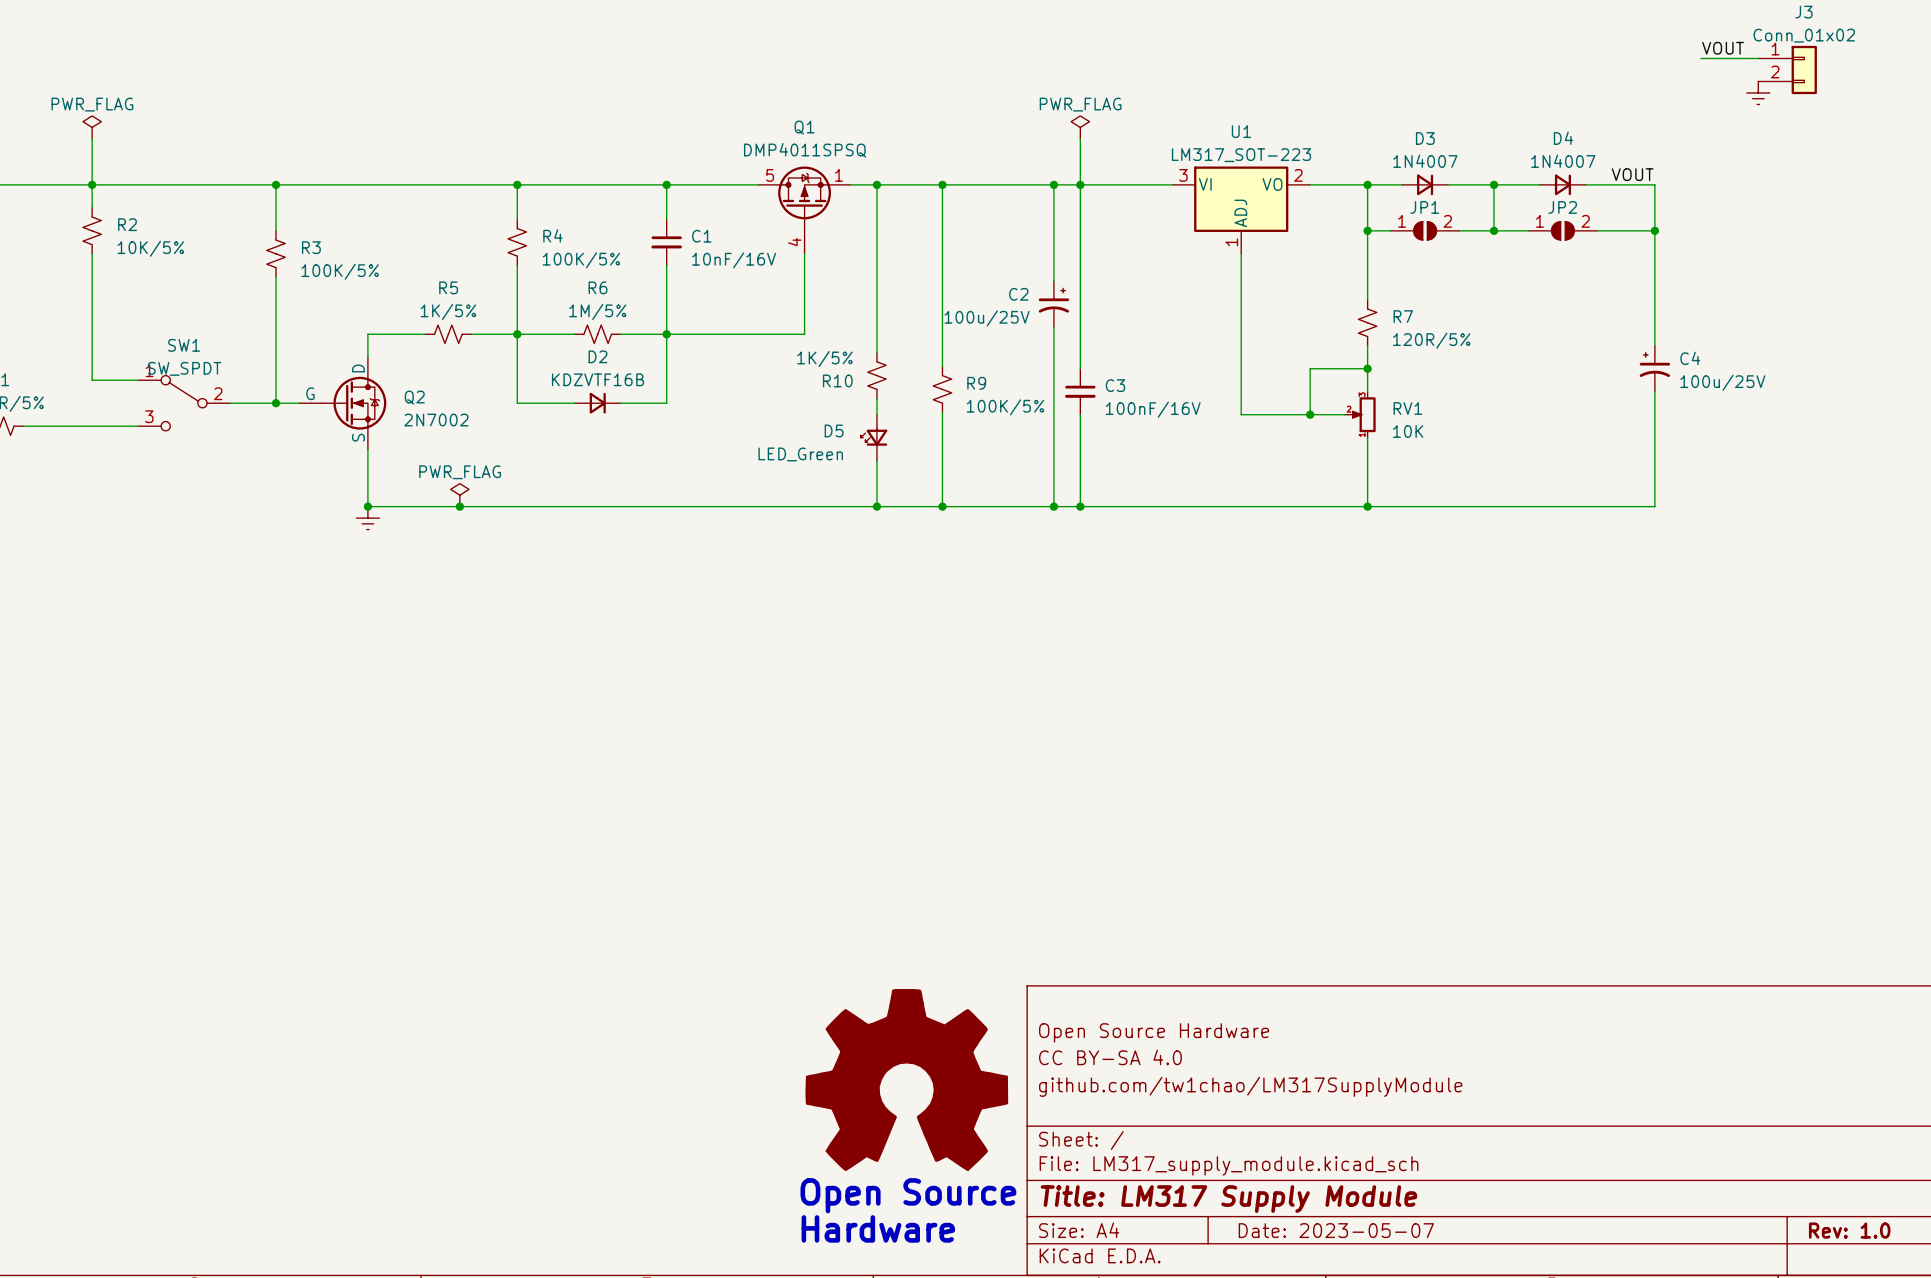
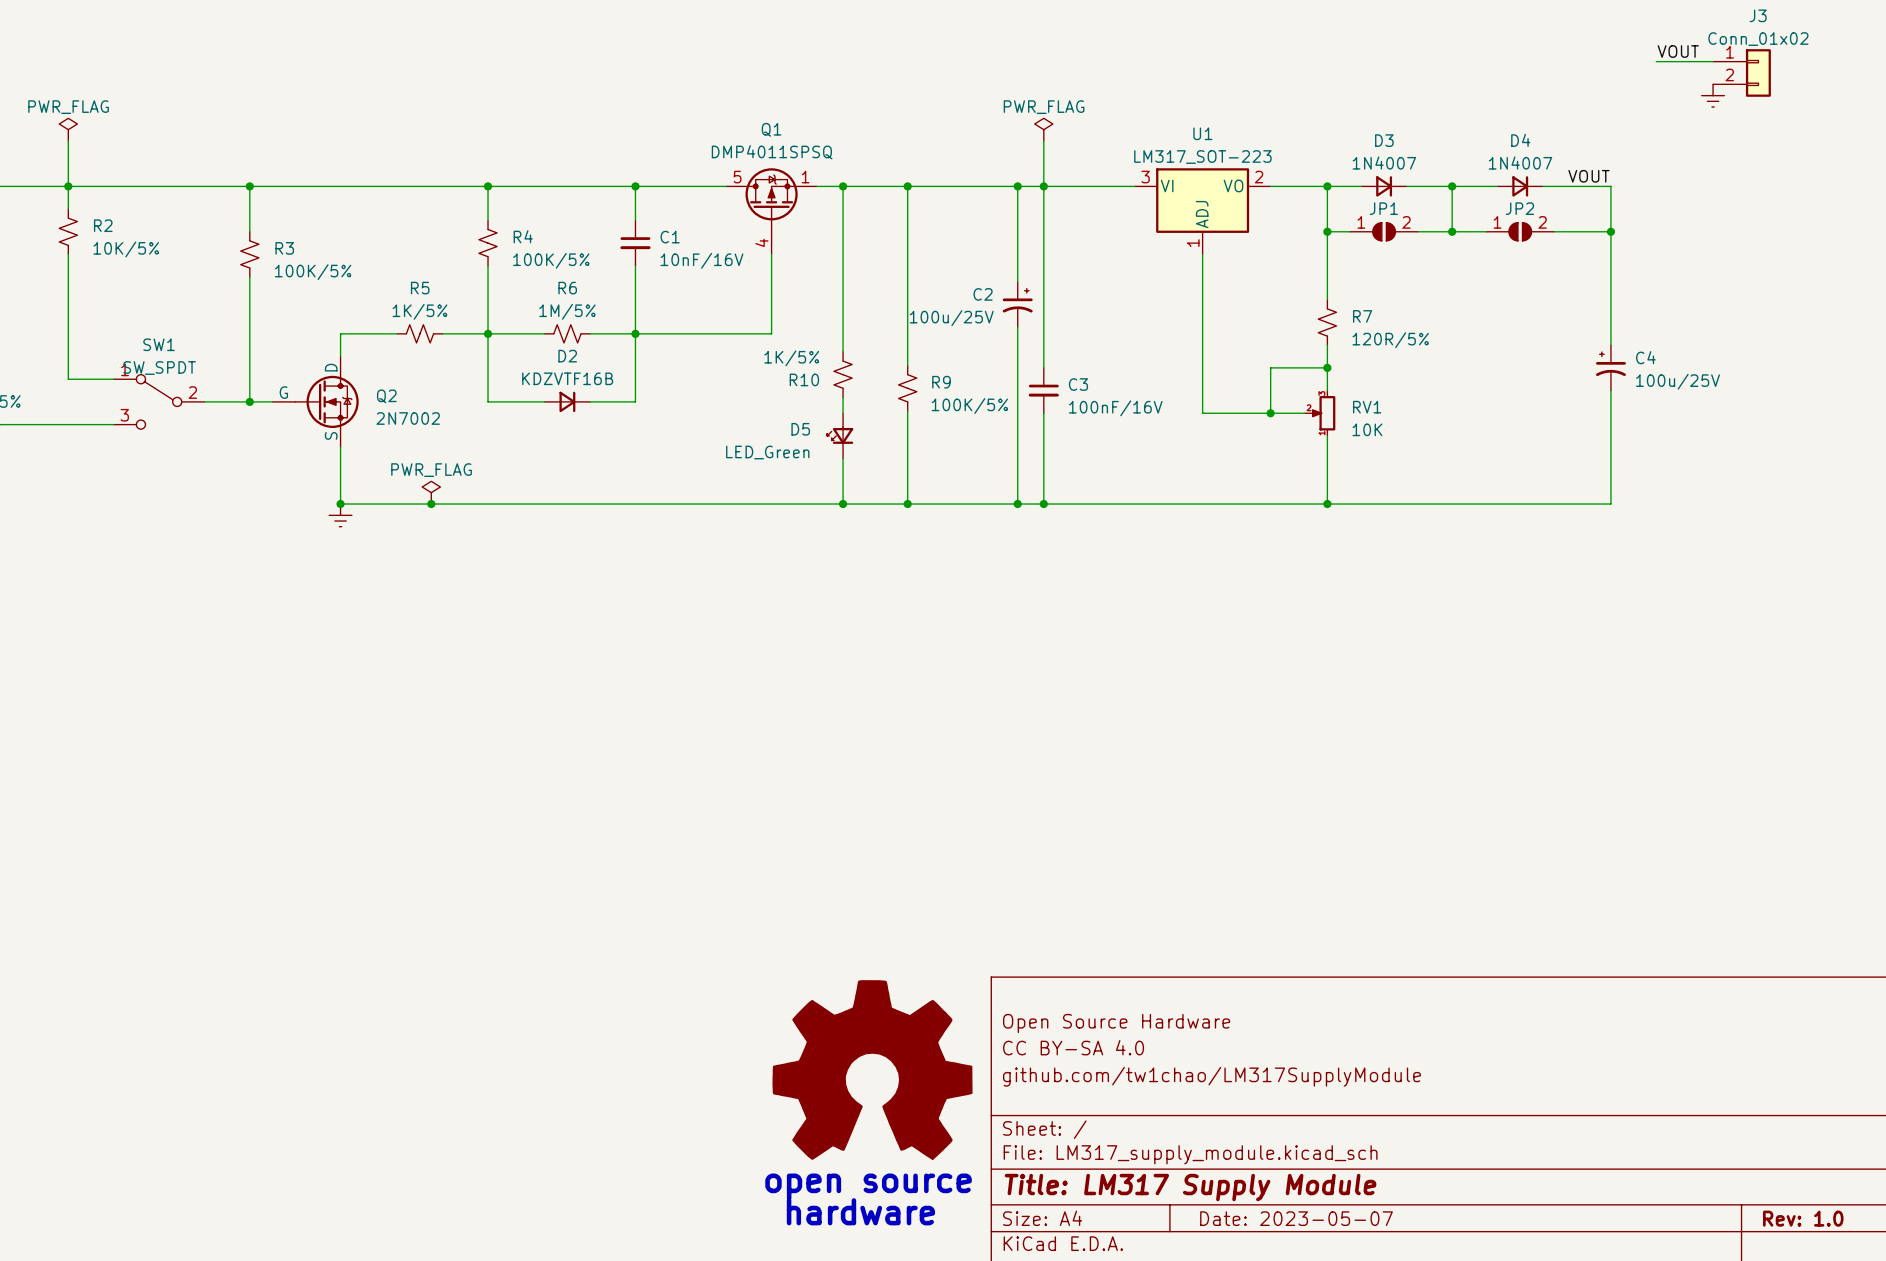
text: Open Source (908, 1195) -> open source (868, 1187)
text: Hardware (878, 1228) -> hardware (860, 1211)

